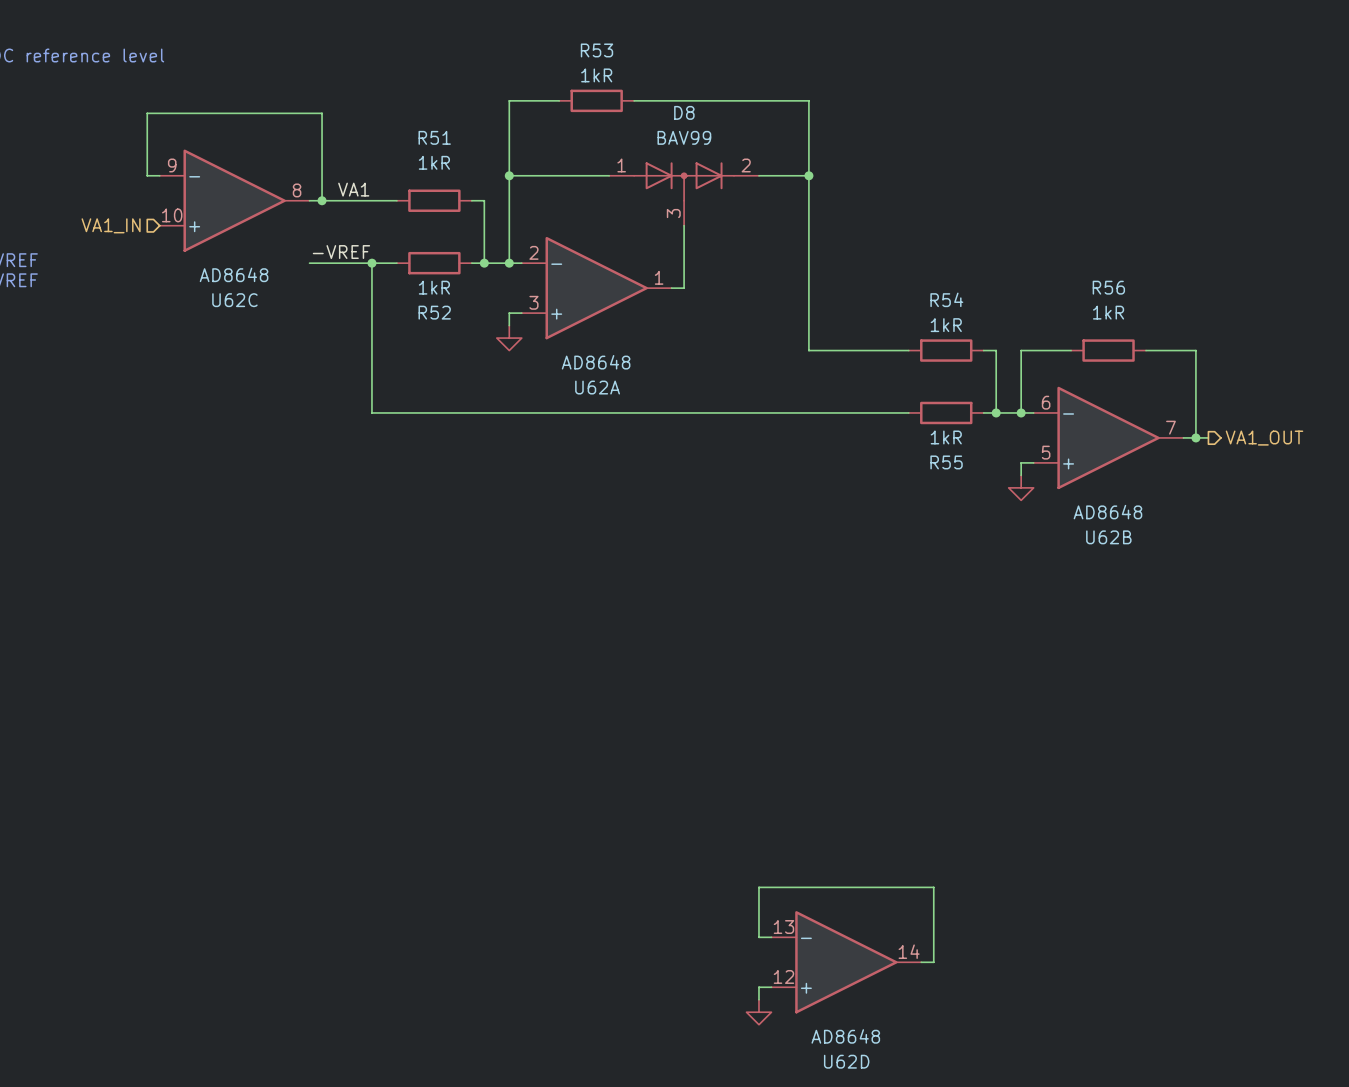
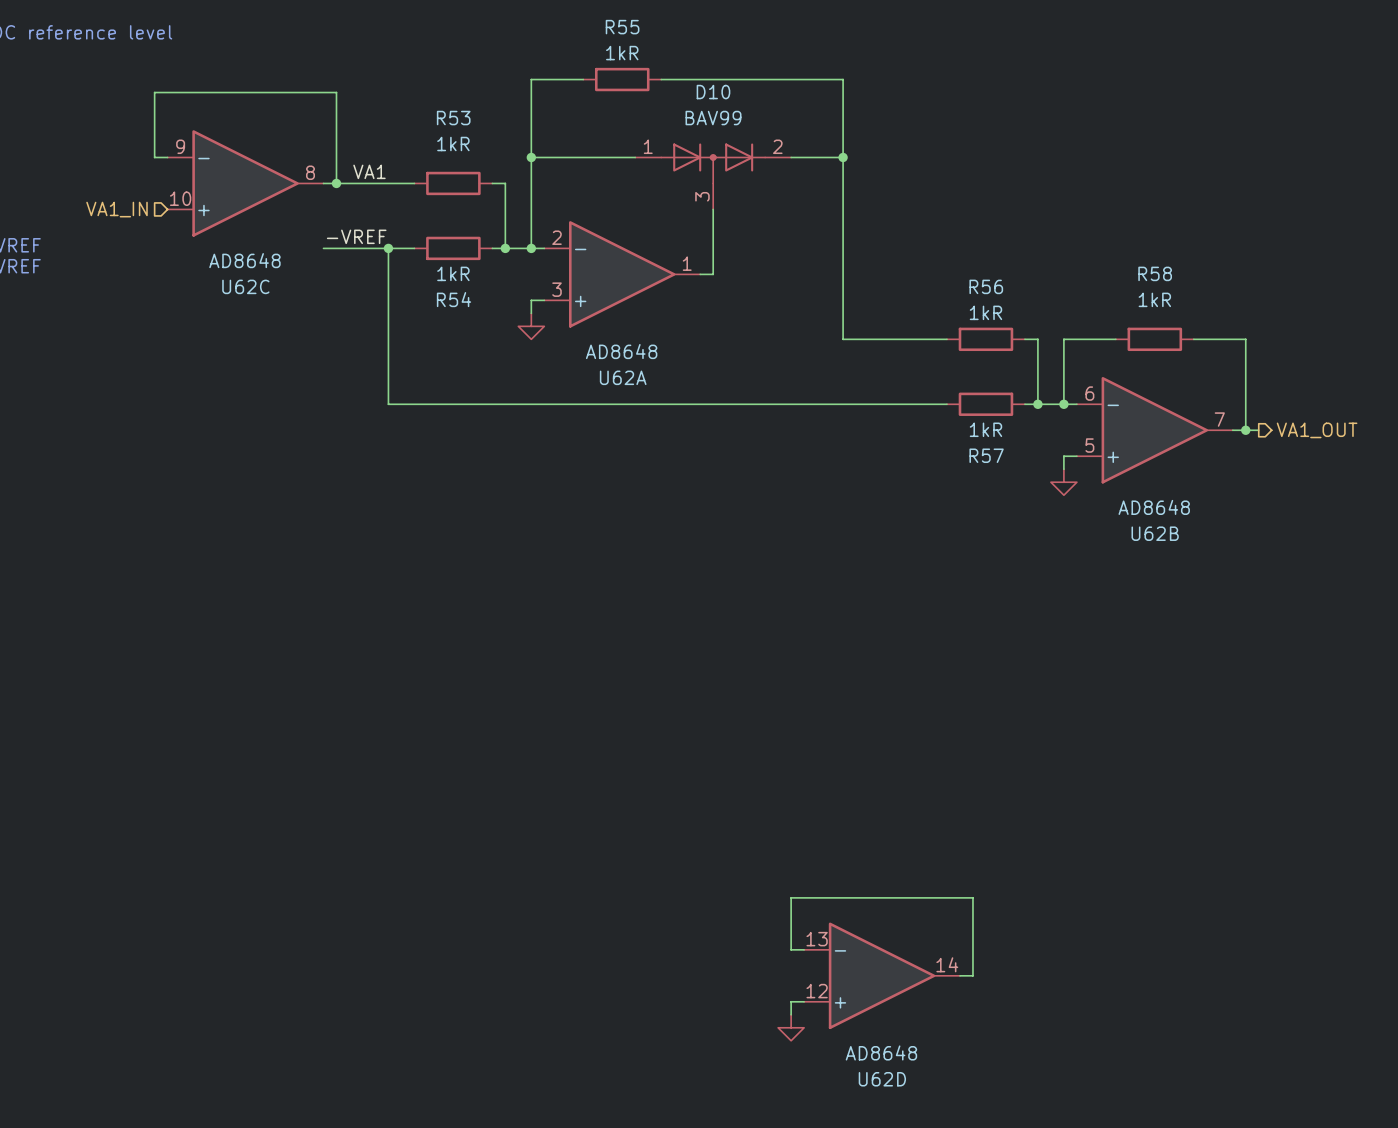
R53 name: R53 (596, 50) -> R55 (622, 27)
D8 name: D8 (684, 112) -> D10 (713, 92)
R51 name: R51 (434, 137) -> R53 (453, 118)
R56 name: R56 (1108, 287) -> R58 (1155, 273)
R54 name: R54 (946, 299) -> R56 (986, 286)
R52 name: R52 (434, 312) -> R54 (454, 299)
R55 name: R55 (946, 462) -> R57 (986, 455)

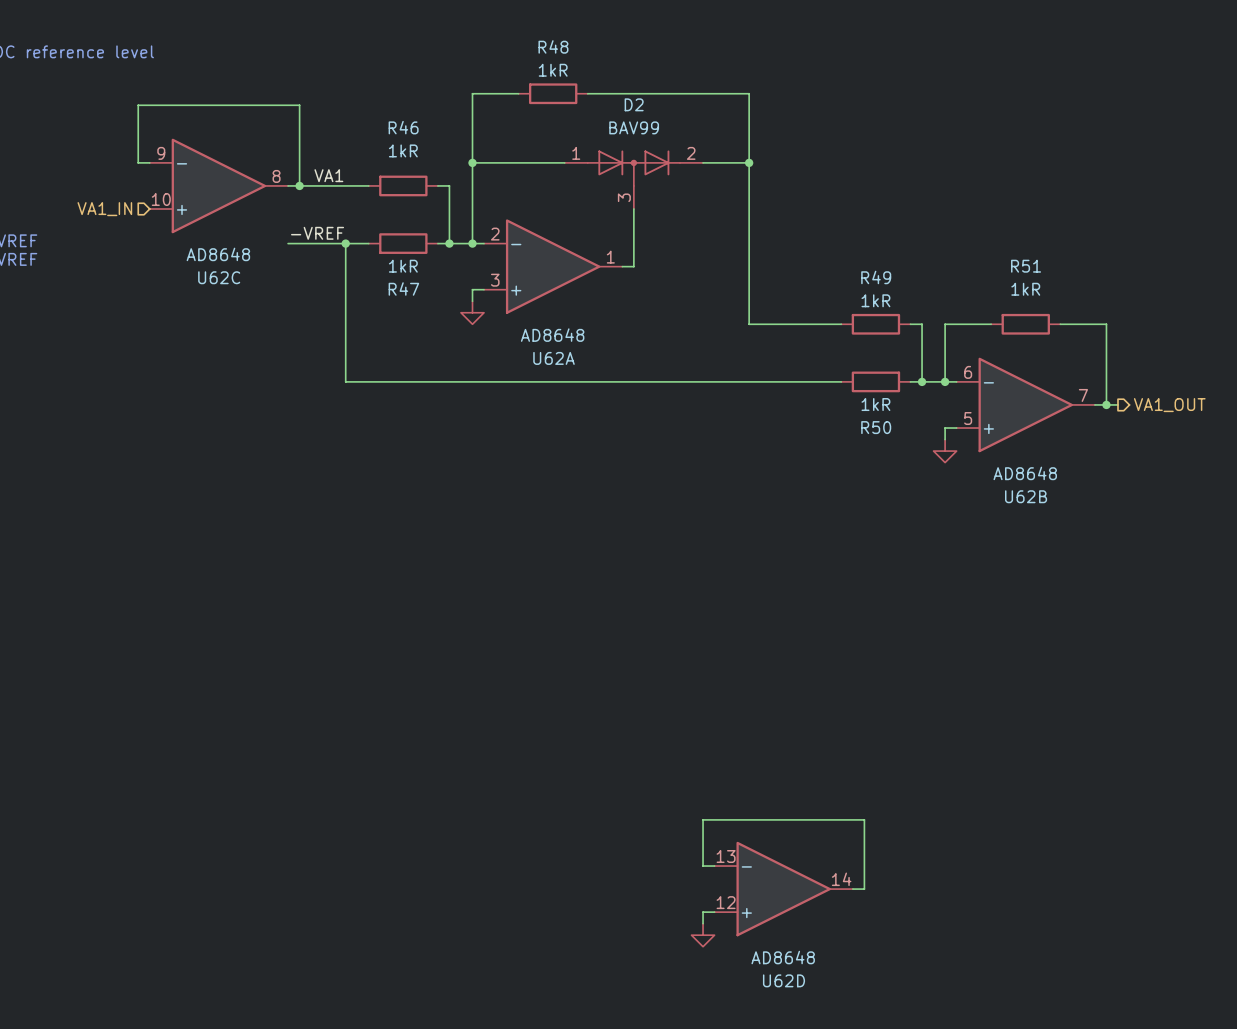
R55 name: R55 (622, 27) -> R48 (553, 46)
D10 name: D10 (713, 92) -> D2 (634, 104)
R53 name: R53 (453, 118) -> R46 (403, 127)
R58 name: R58 (1155, 273) -> R51 (1026, 266)
R56 name: R56 (986, 286) -> R49 (876, 277)
R54 name: R54 (454, 299) -> R47 (403, 288)
R57 name: R57 (986, 455) -> R50 (876, 427)

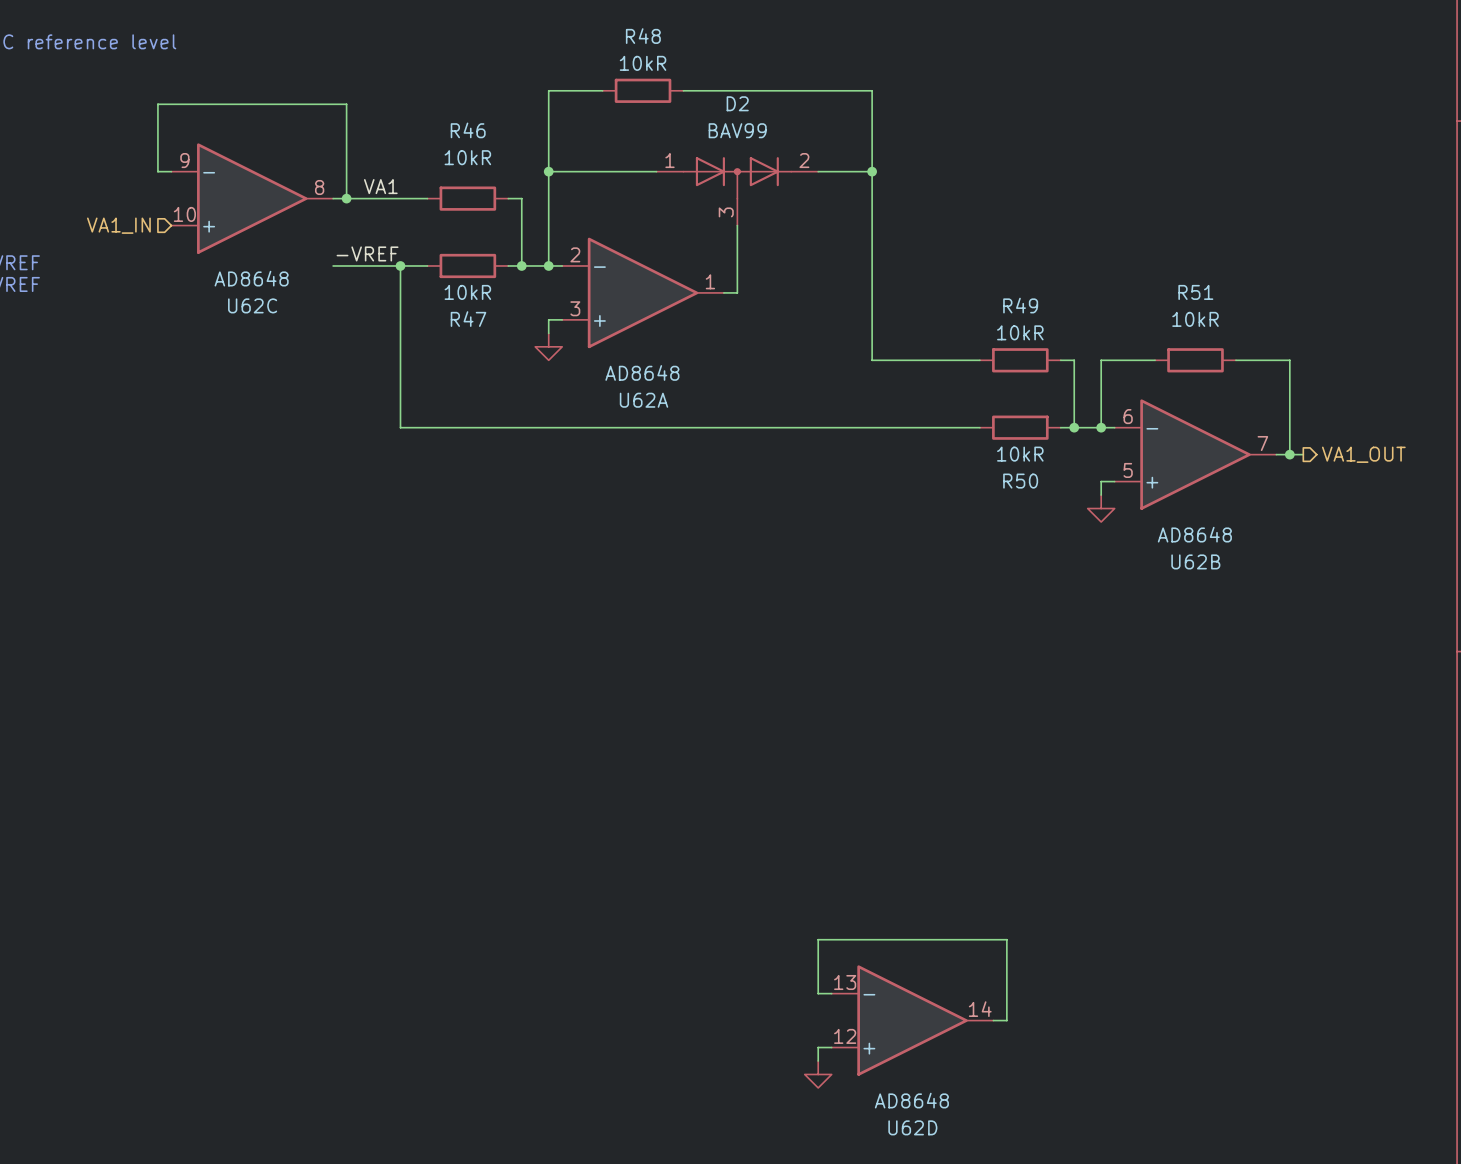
R48 value: 1kR (553, 70) -> 10kR (643, 63)
R46 value: 1kR (403, 150) -> 10kR (467, 157)
R47 value: 1kR (403, 266) -> 10kR (467, 292)
R51 value: 1kR (1025, 289) -> 10kR (1195, 319)
R49 value: 1kR (875, 300) -> 10kR (1020, 332)
R50 value: 1kR (875, 404) -> 10kR (1020, 454)

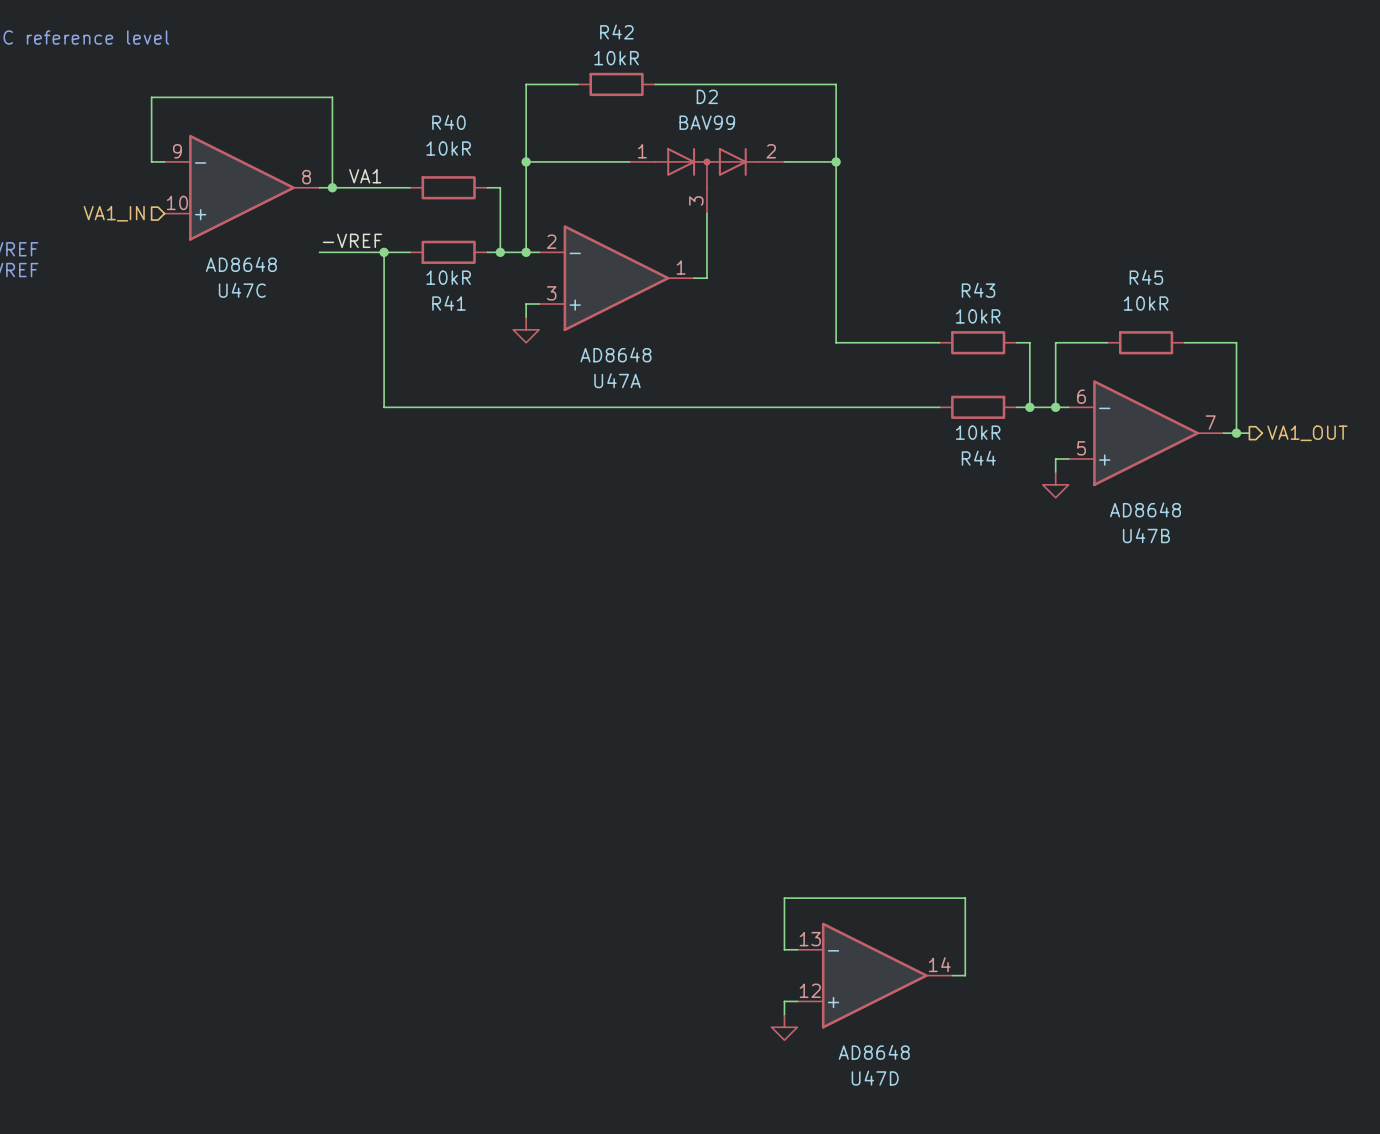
R48 name: R48 (643, 36) -> R42 (616, 32)
R46 name: R46 (468, 130) -> R40 (448, 122)
R51 name: R51 (1195, 292) -> R45 (1146, 277)
U62C name: U62C (252, 305) -> U47C (242, 290)
R49 name: R49 (1020, 305) -> R43 (978, 290)
R47 name: R47 (468, 319) -> R41 (448, 303)
U62A name: U62A (644, 400) -> U47A (617, 380)
R50 name: R50 (1020, 481) -> R44 (978, 458)
U62B name: U62B (1195, 561) -> U47B (1146, 535)
U62D name: U62D (912, 1127) -> U47D (875, 1078)

